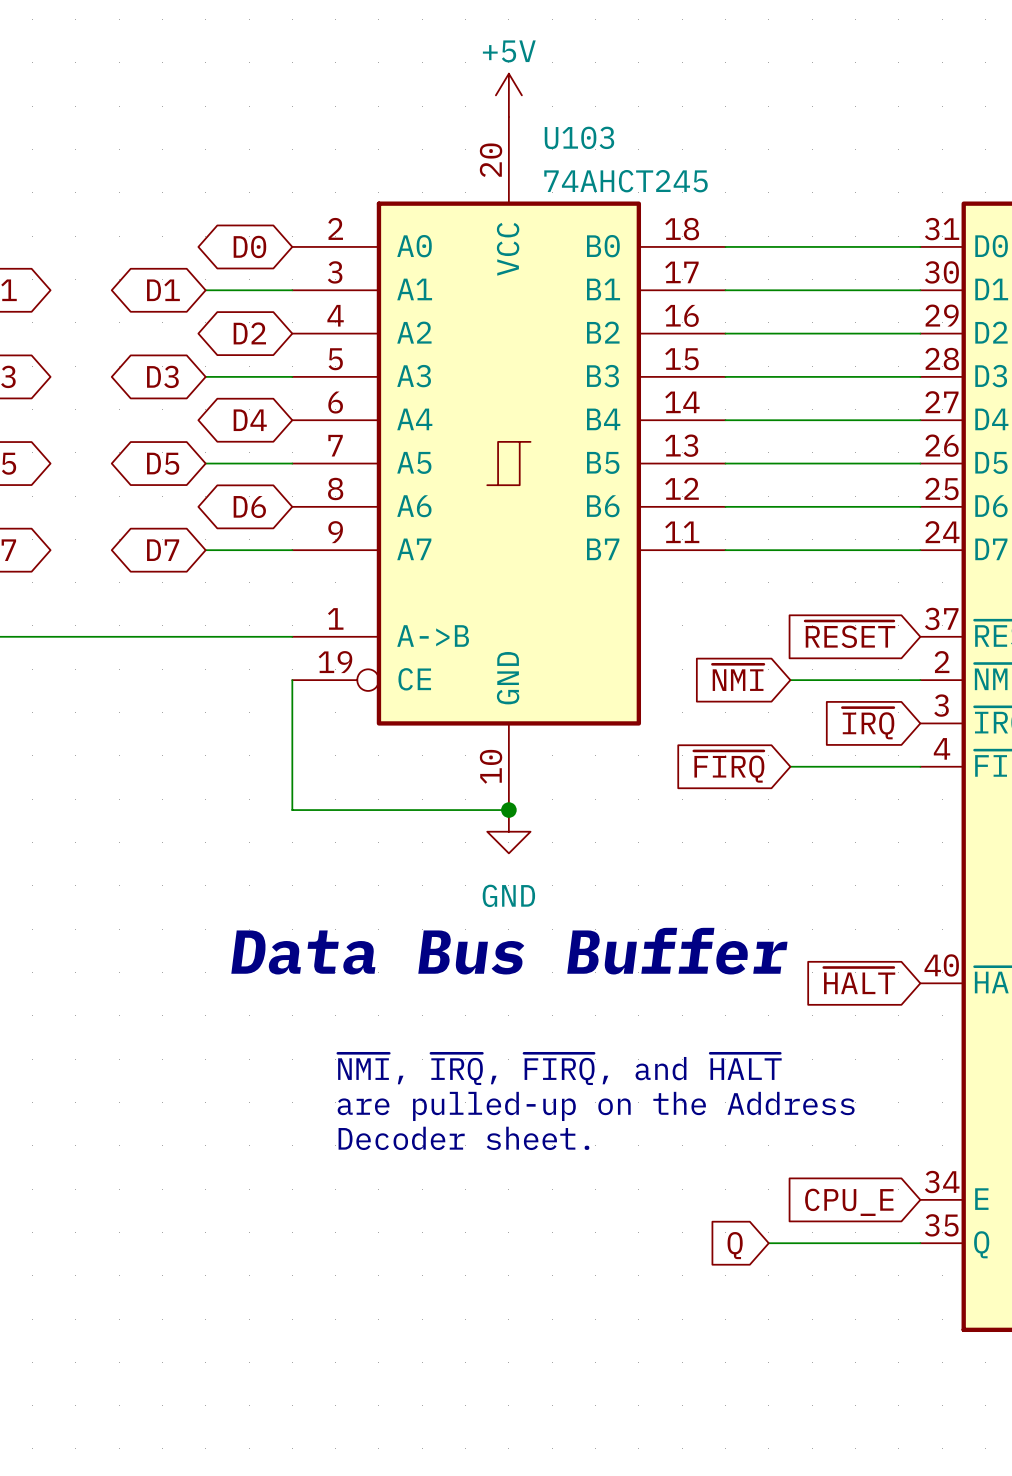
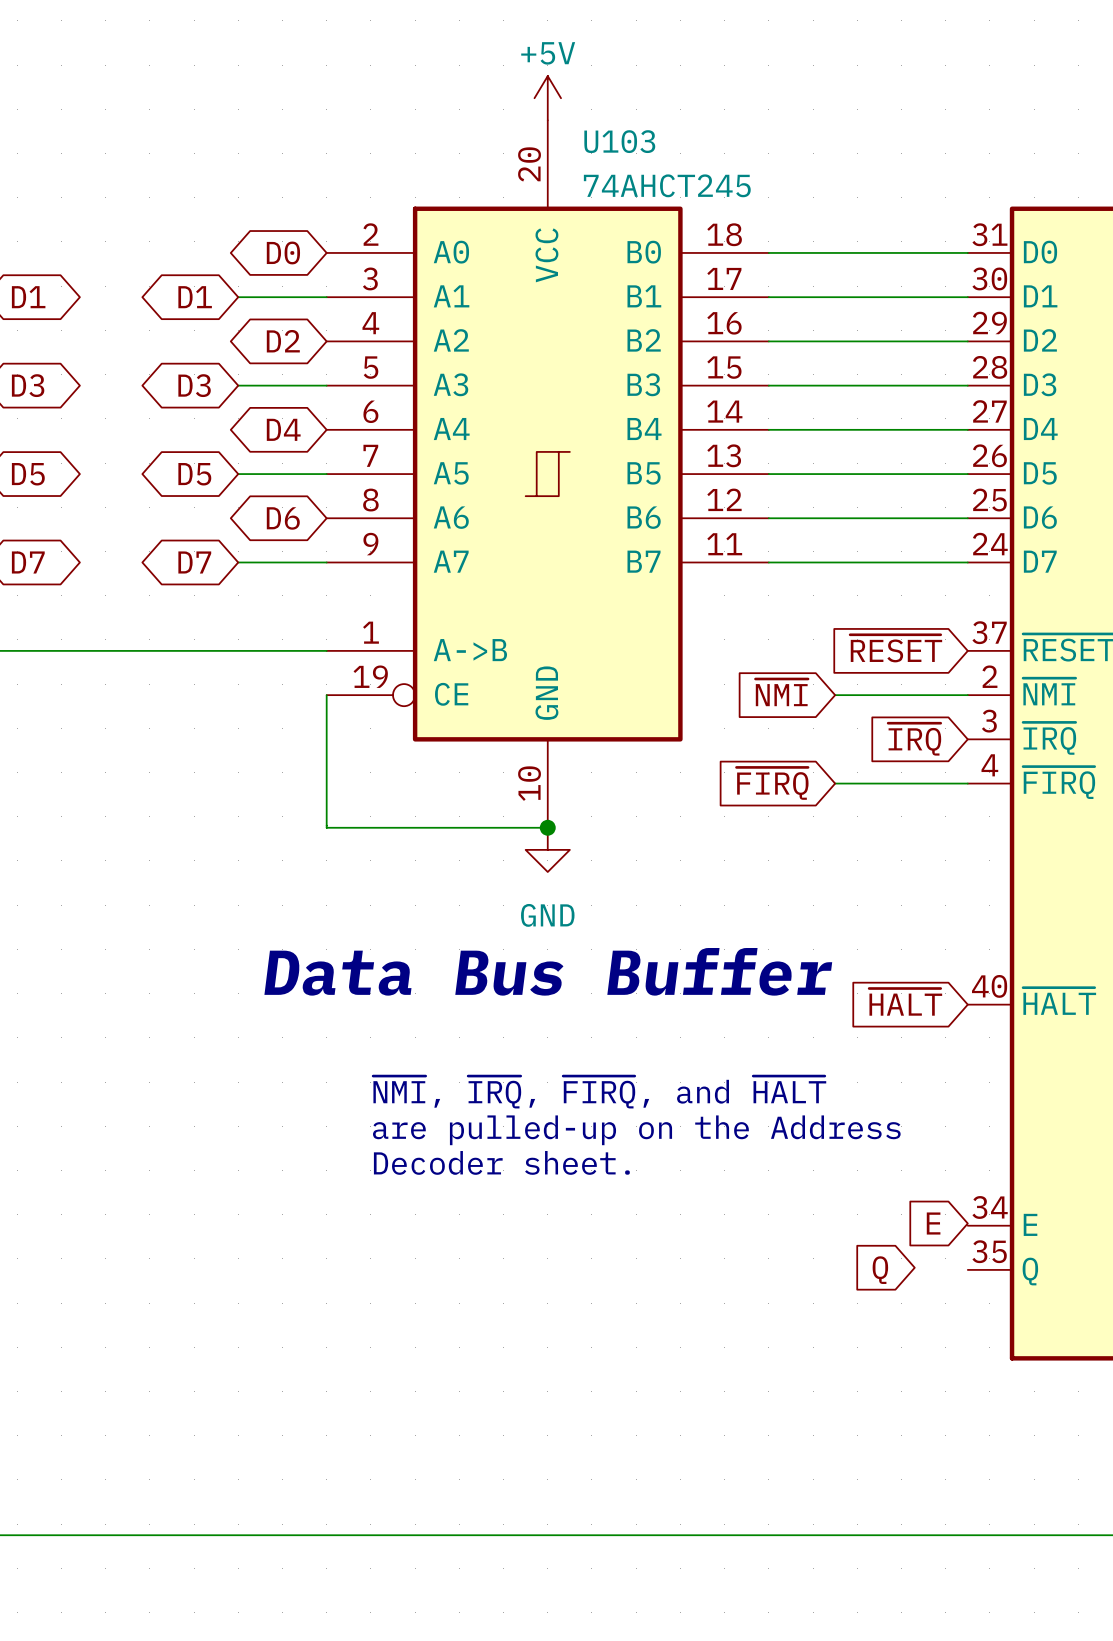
global label: CPU_E (849, 1202) -> E (933, 1223)
wire: (768, 1243) (920, 1243) -> none
global label position: Q (735, 1245) -> Q (880, 1270)

